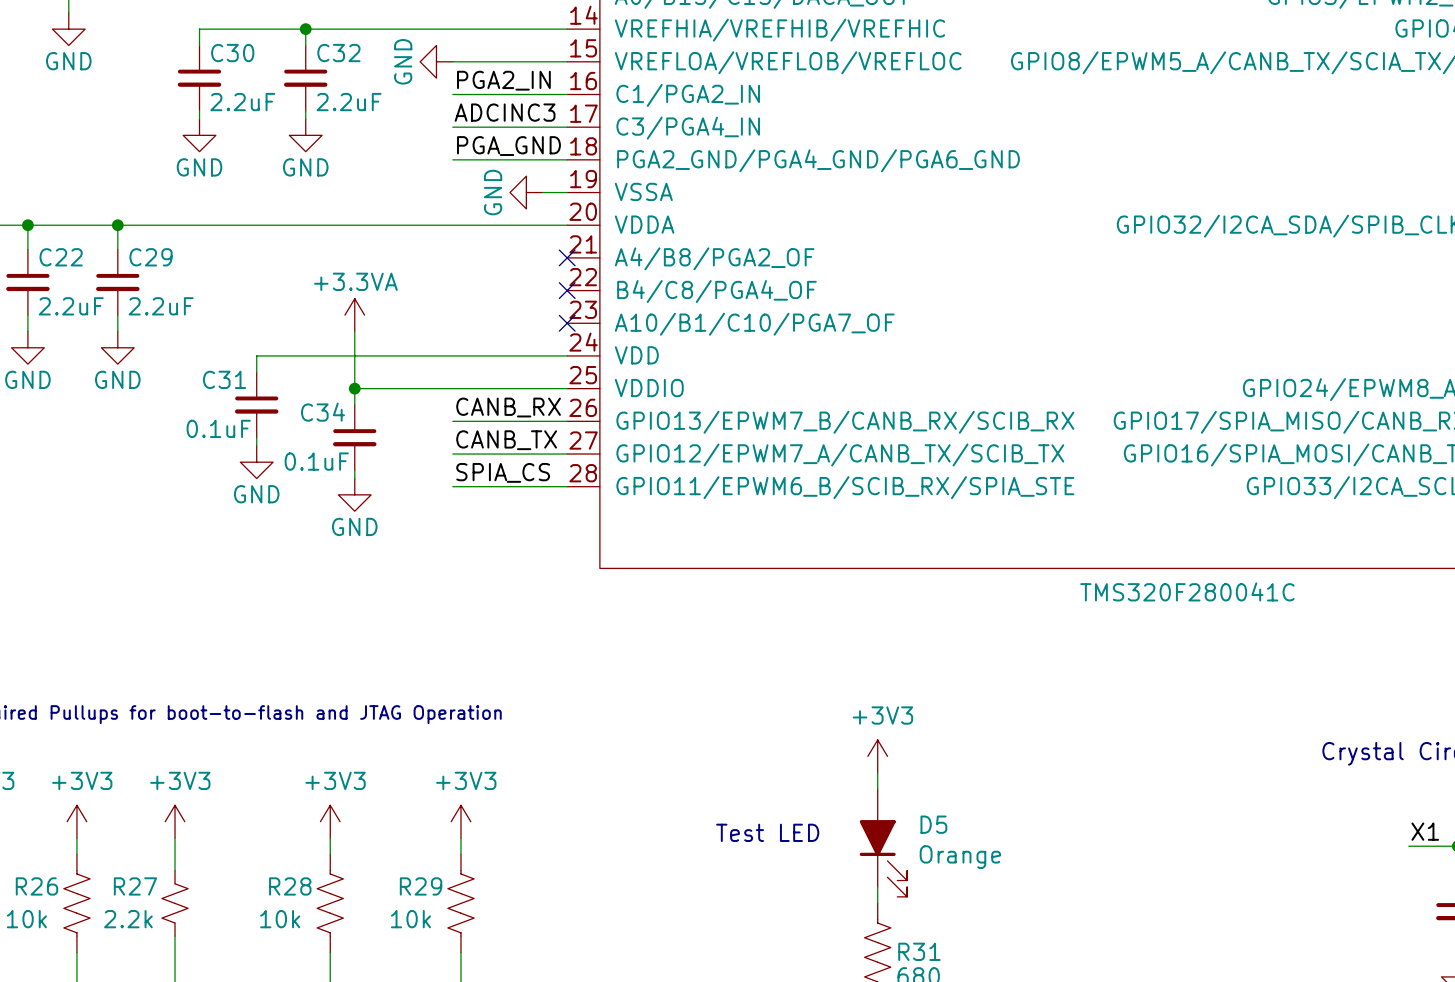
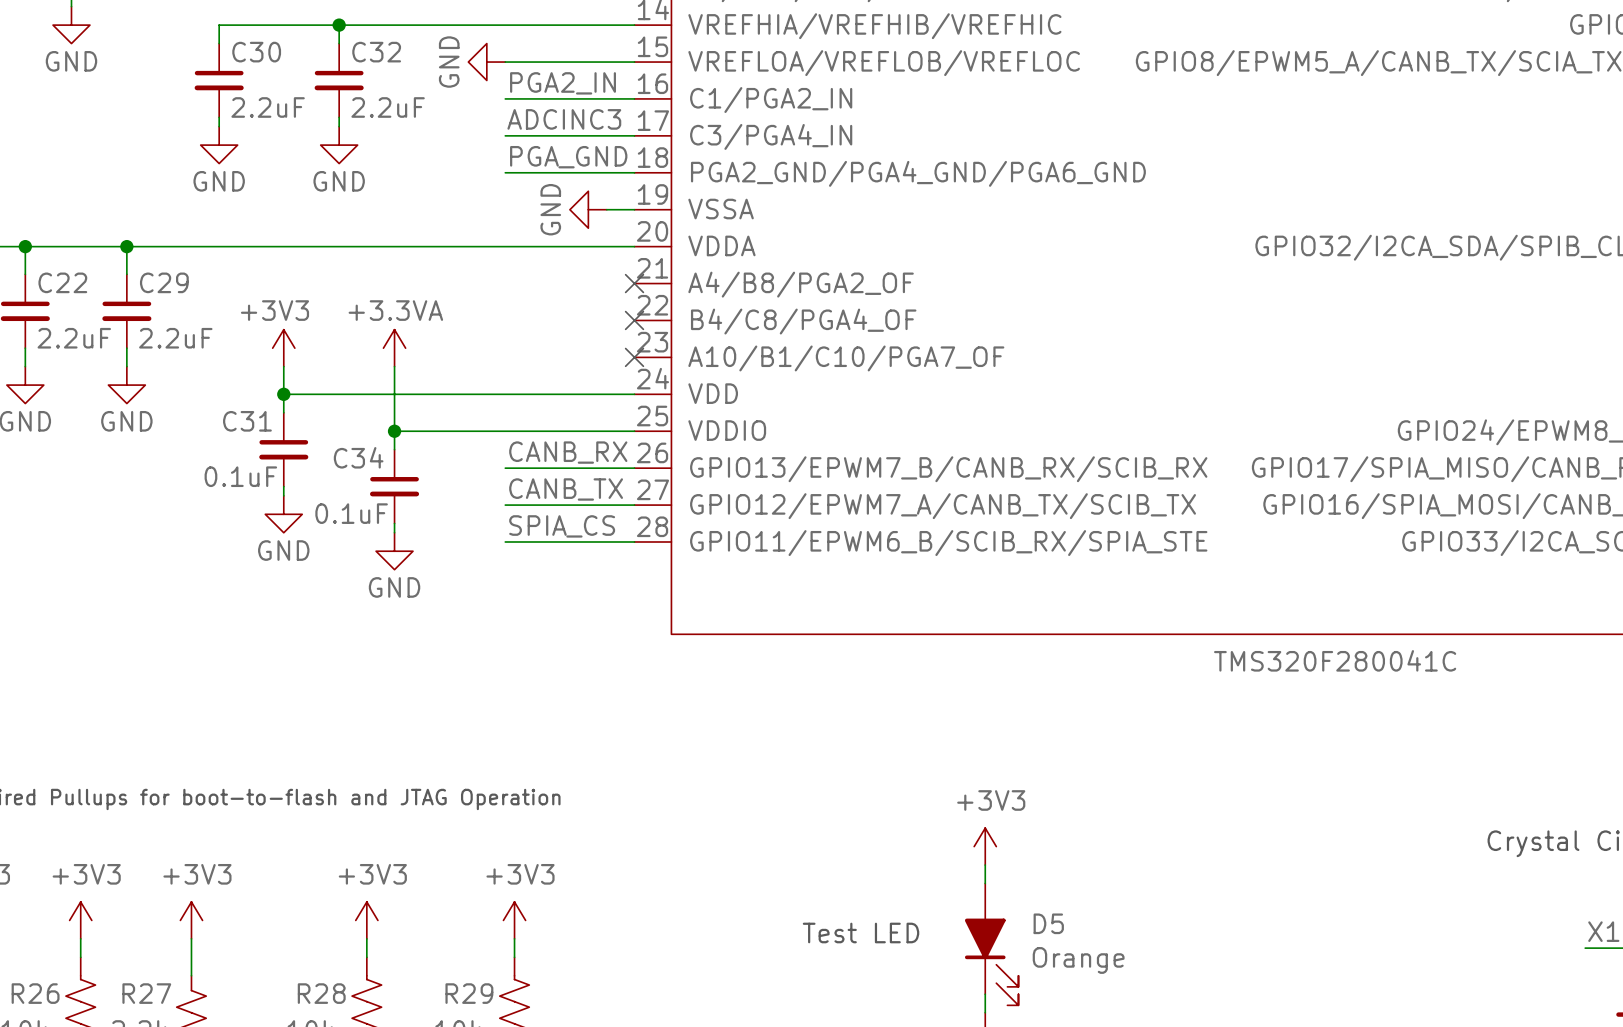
power symbol: none -> +3V3 (283, 348)
wire: none -> (283, 366) (283, 394)
junction: none -> (283, 394)

